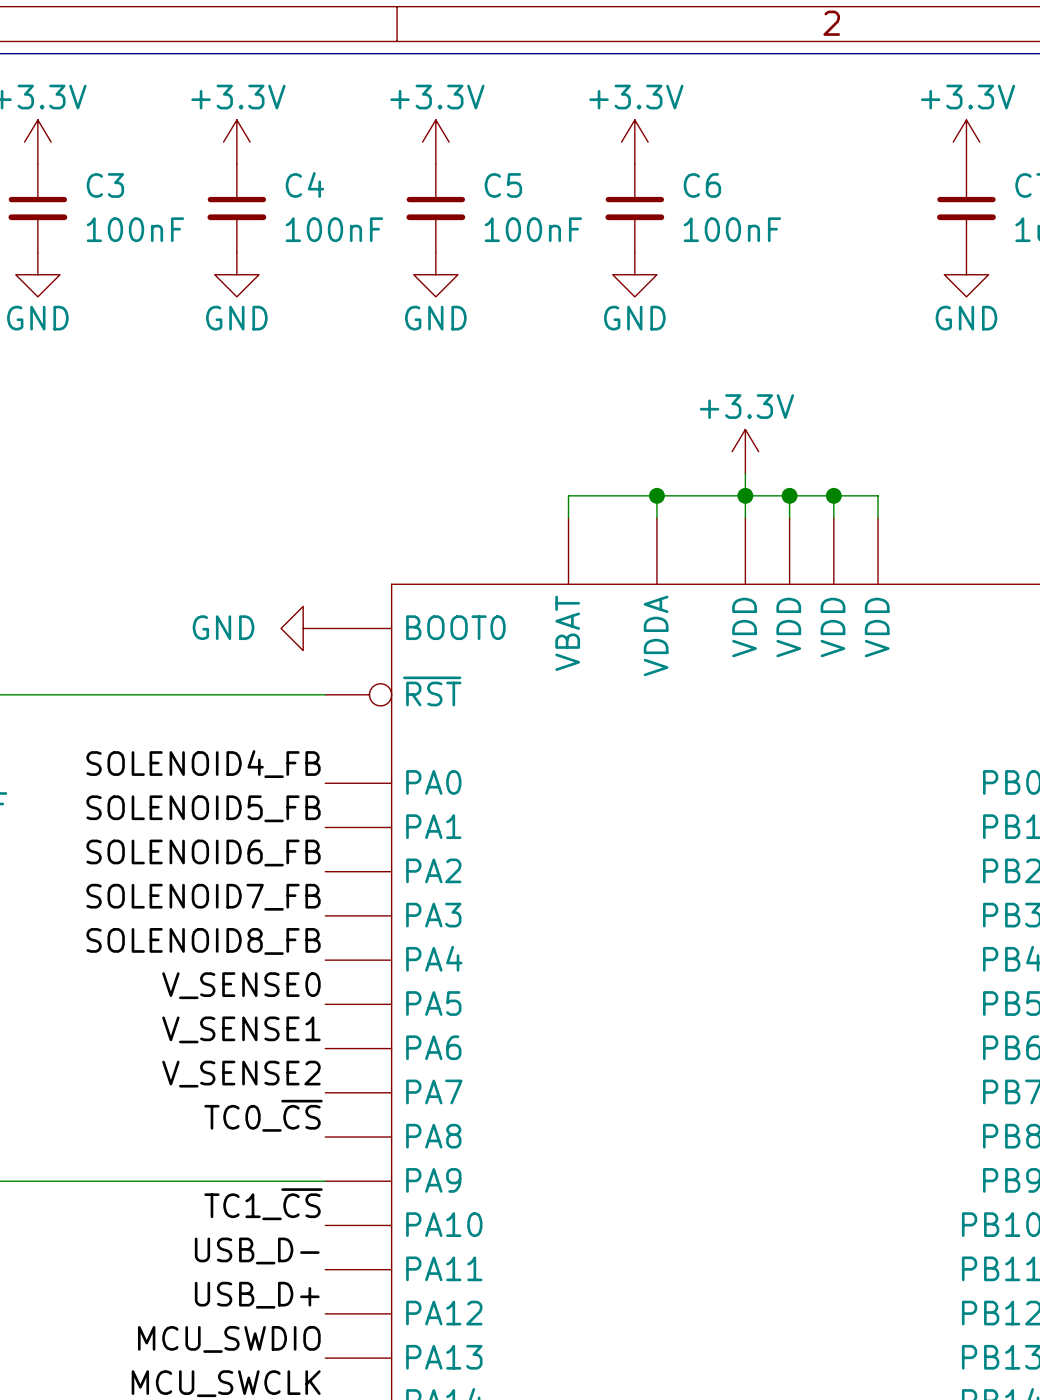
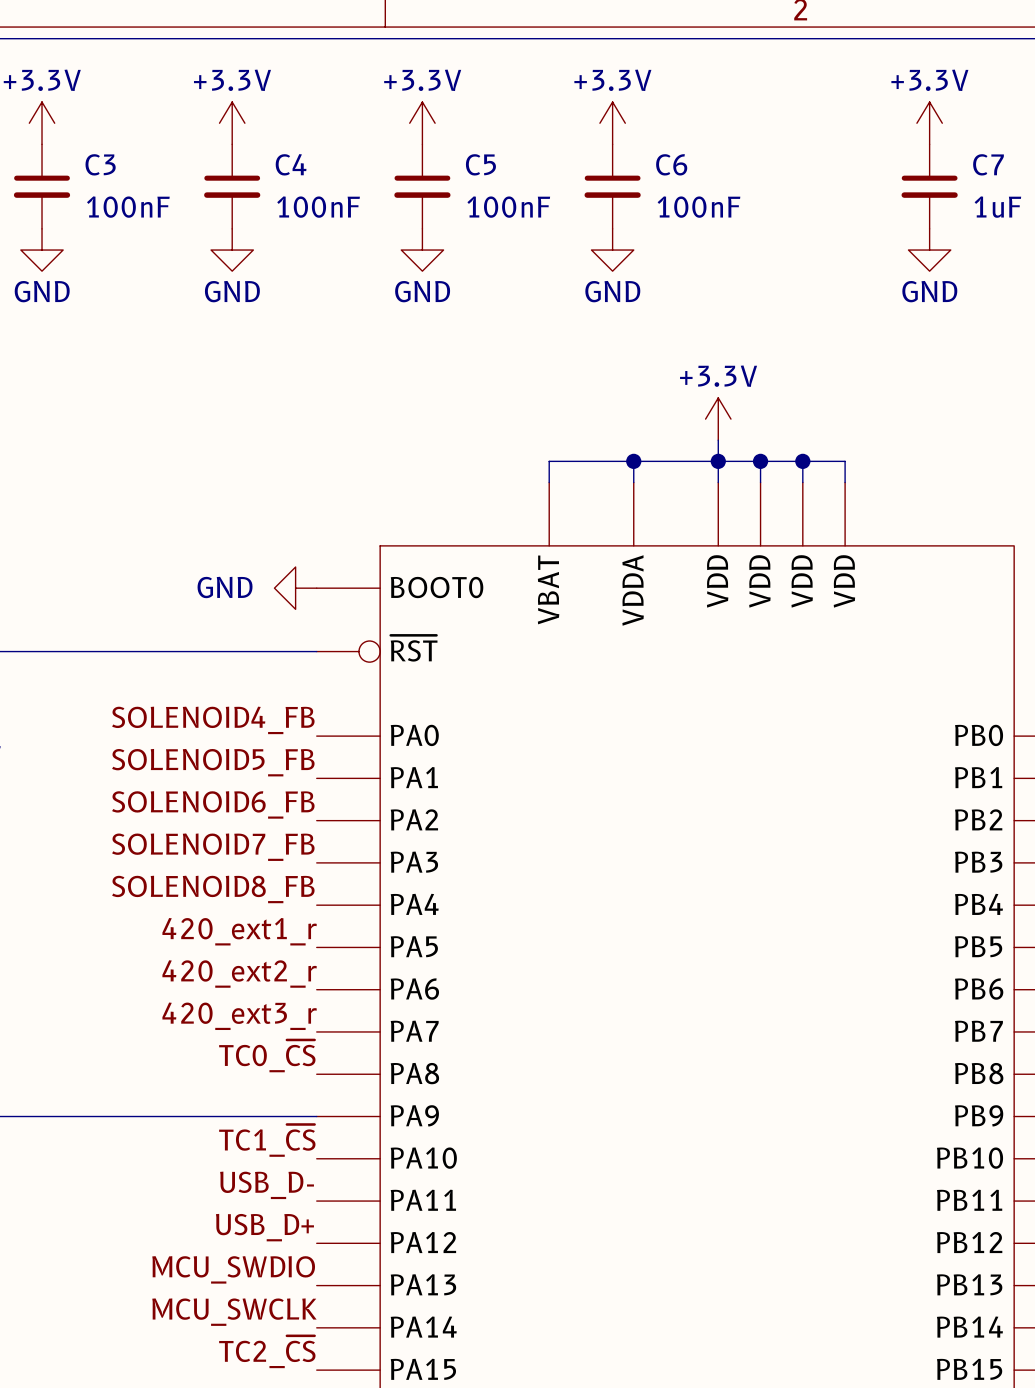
label: V_SENSE0 (241, 985) -> 420_ext1_r (239, 931)
label: V_SENSE1 (241, 1029) -> 420_ext2_r (239, 974)
label: V_SENSE2 (241, 1074) -> 420_ext3_r (239, 1016)

